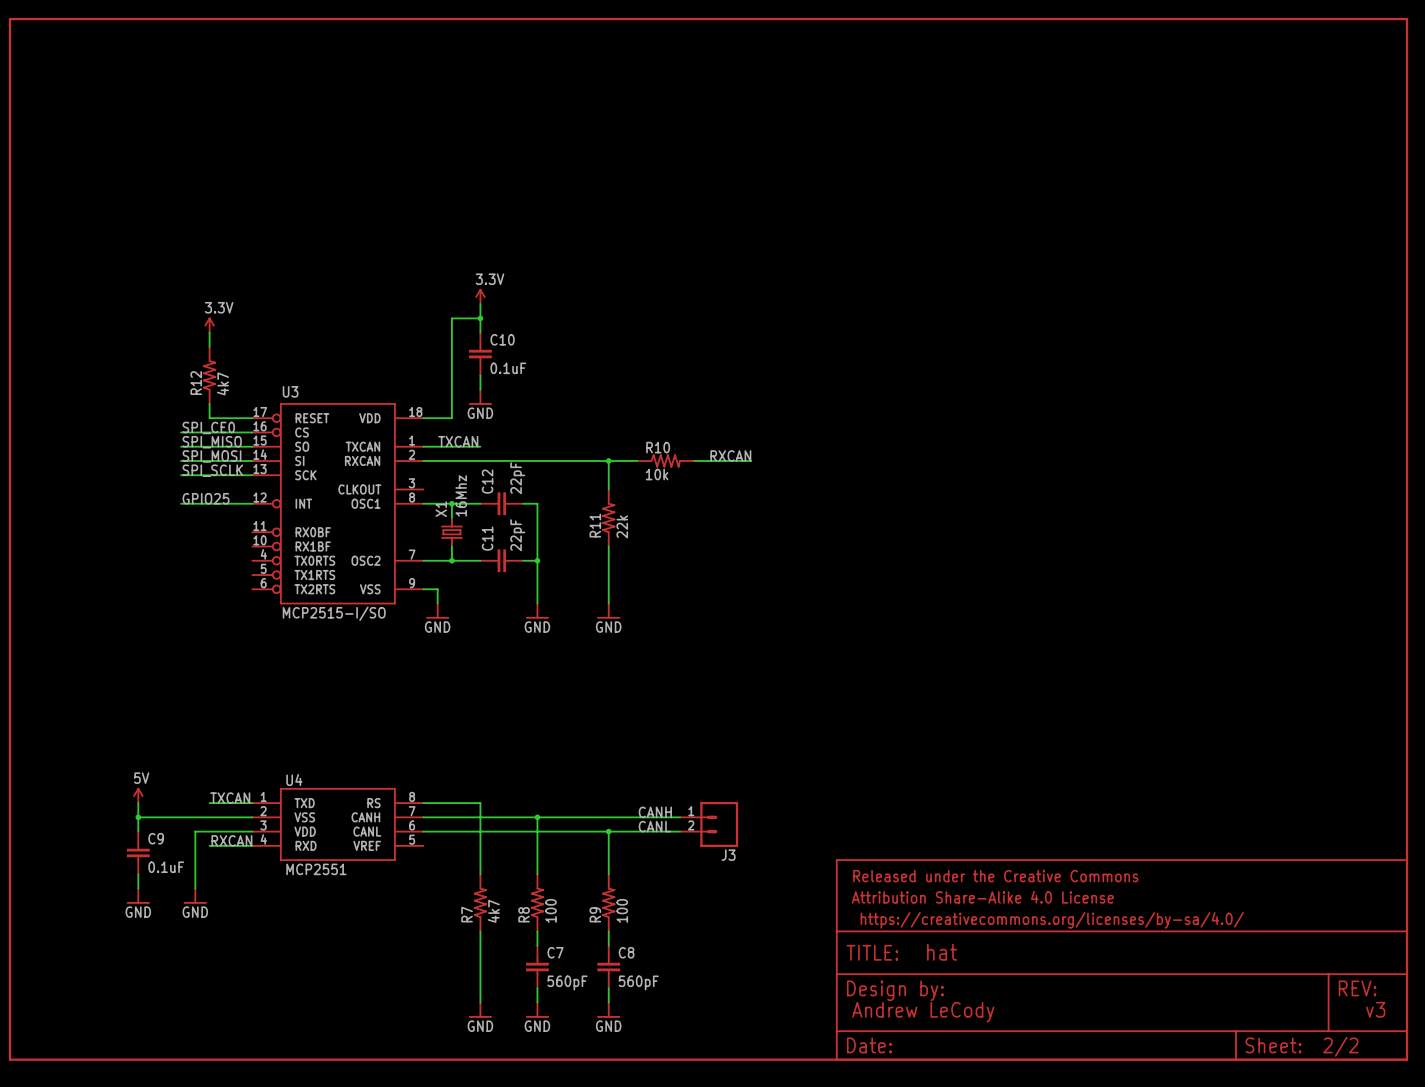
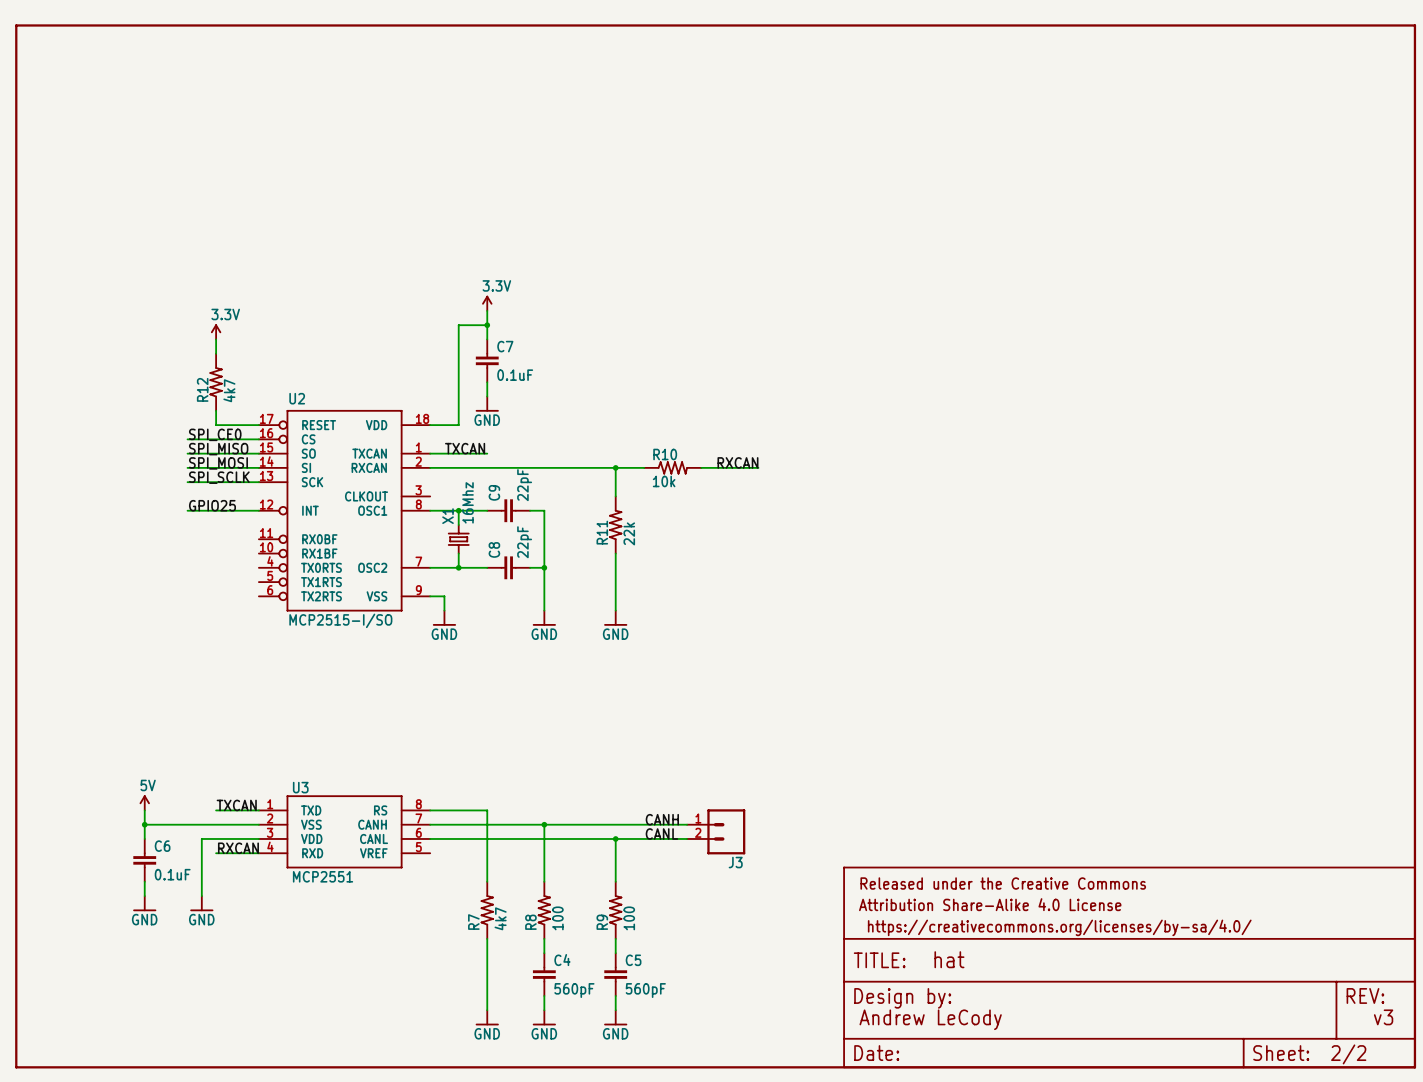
C10 name: C10 (502, 339) -> C7 (505, 346)
U3 name: U3 (290, 391) -> U2 (297, 398)
C12 name: C12 (487, 481) -> C9 (494, 492)
C11 name: C11 (487, 538) -> C8 (494, 549)
U4 name: U4 (294, 780) -> U3 (300, 787)
C9 name: C9 (156, 838) -> C6 (162, 846)
C7 name: C7 (555, 952) -> C4 (562, 960)
C8 name: C8 (626, 952) -> C5 (633, 960)

